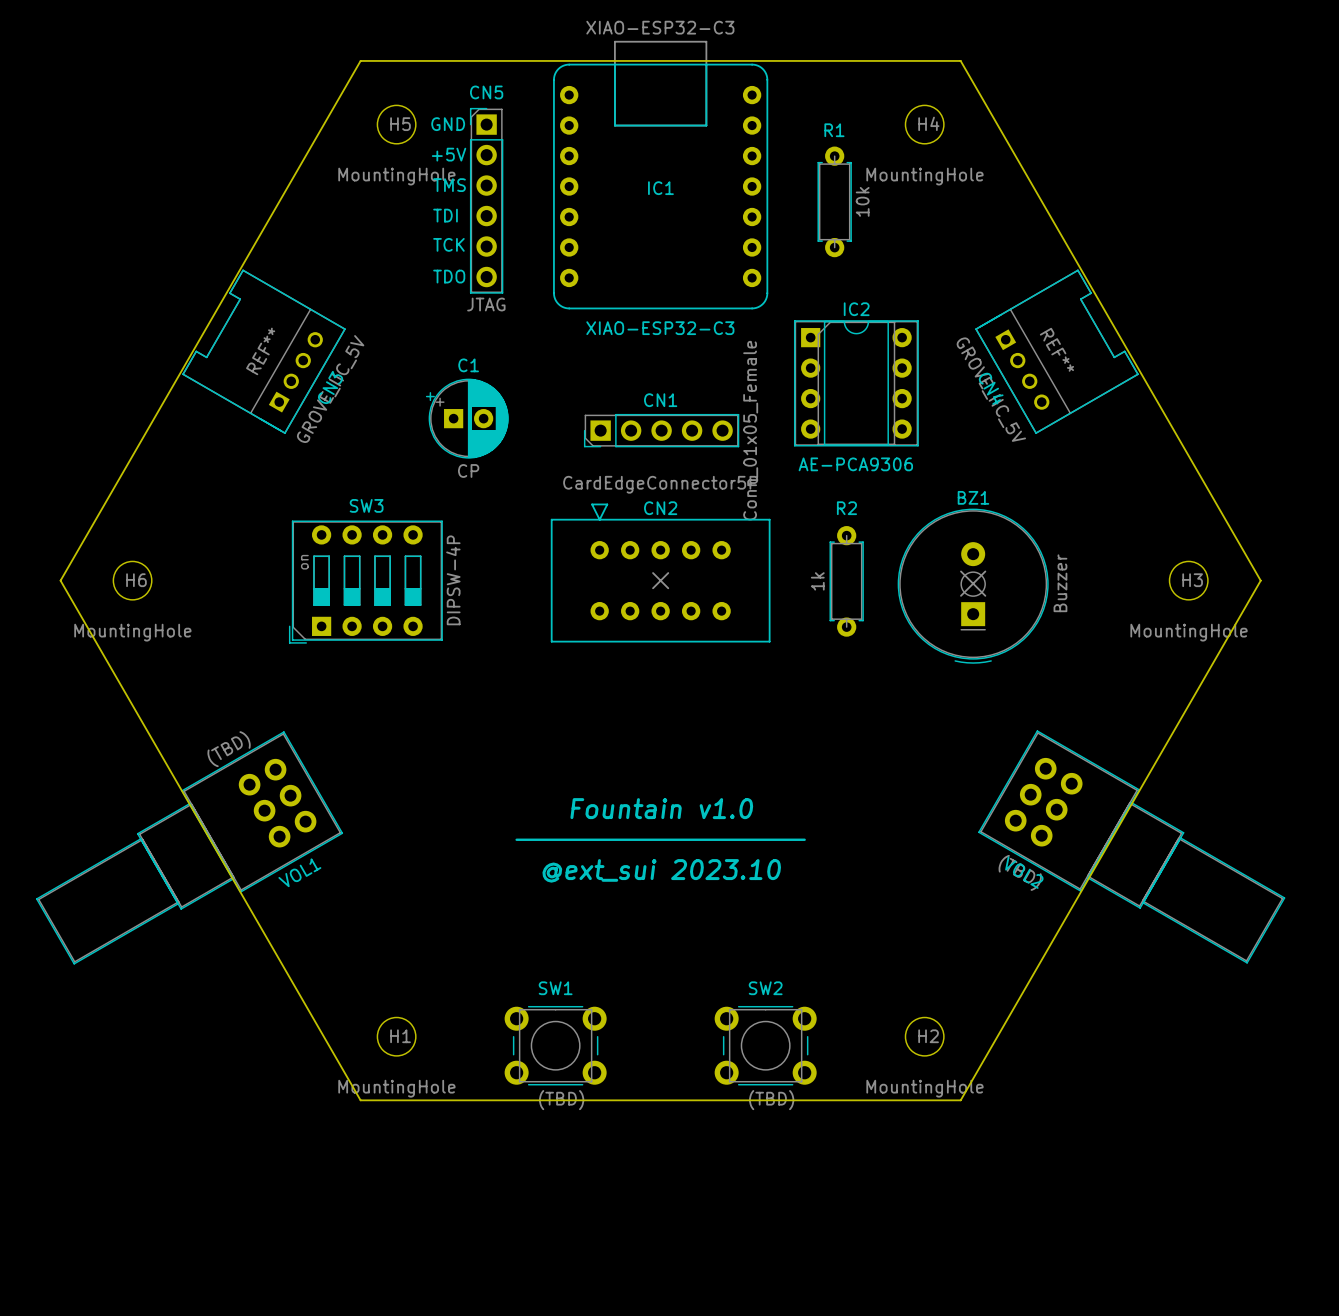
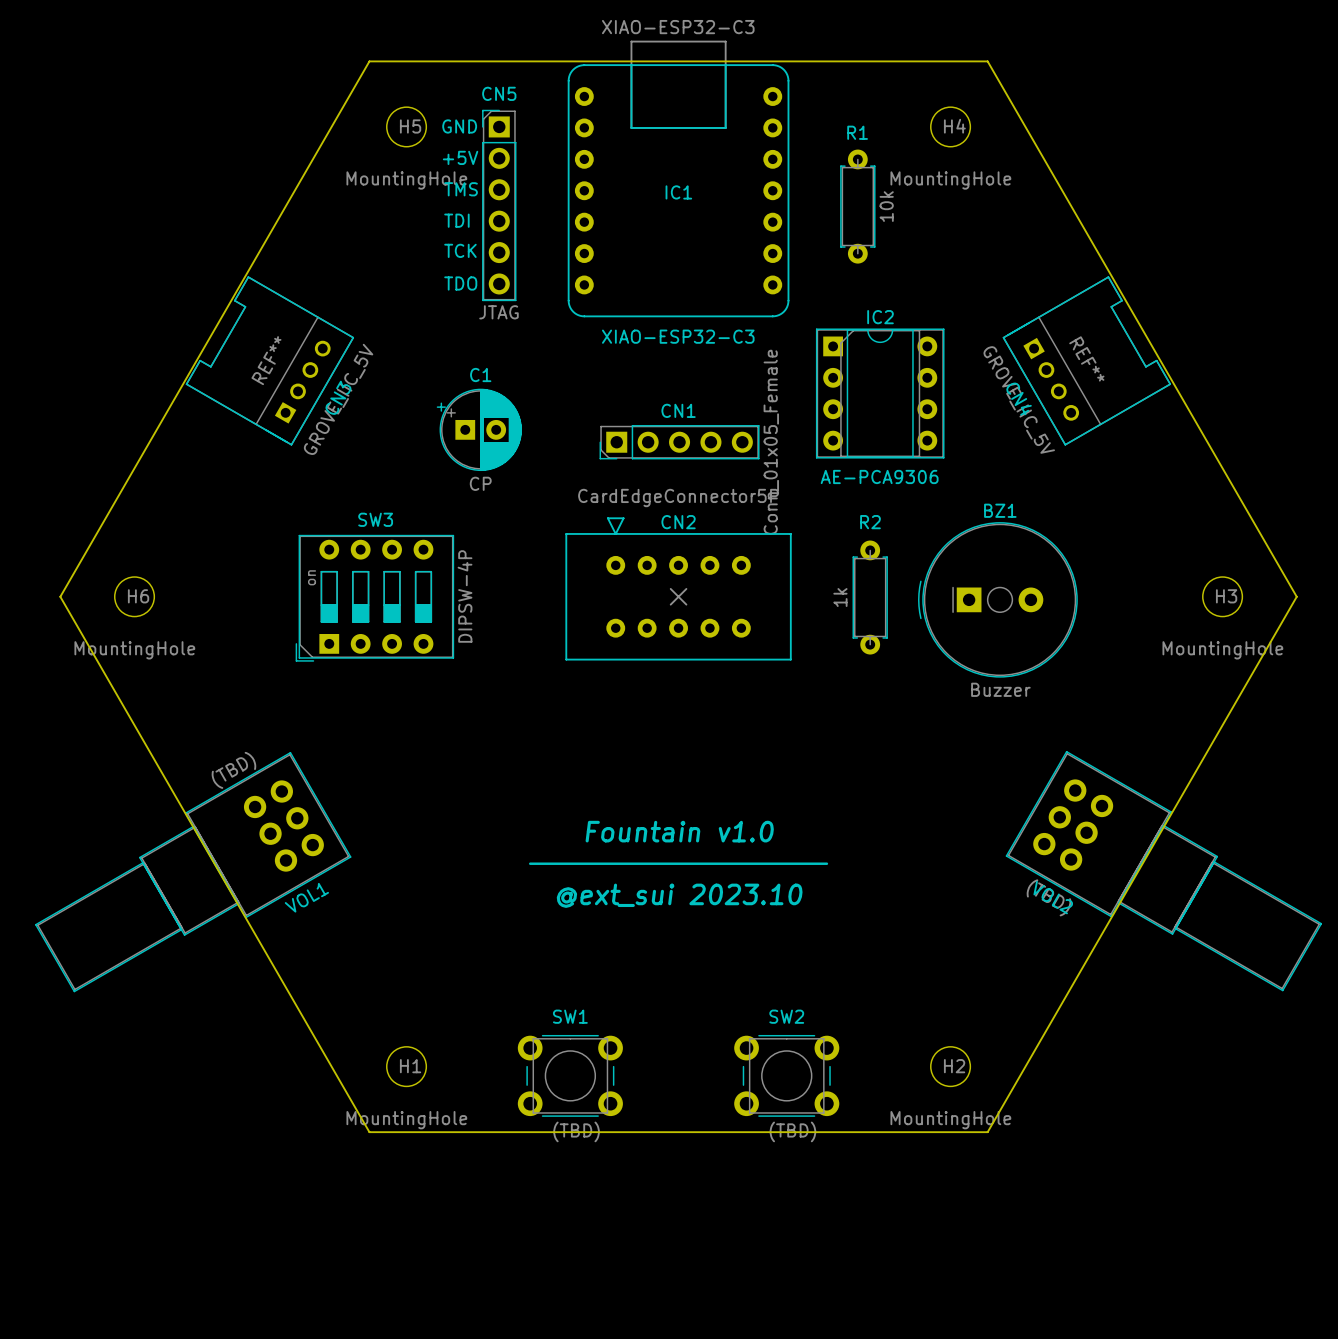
line: (960, 571) (985, 595) -> none
line: (985, 571) (960, 595) -> none
BZ1 rotation: 0° (973, 586) -> 90° clockwise (997, 599)

